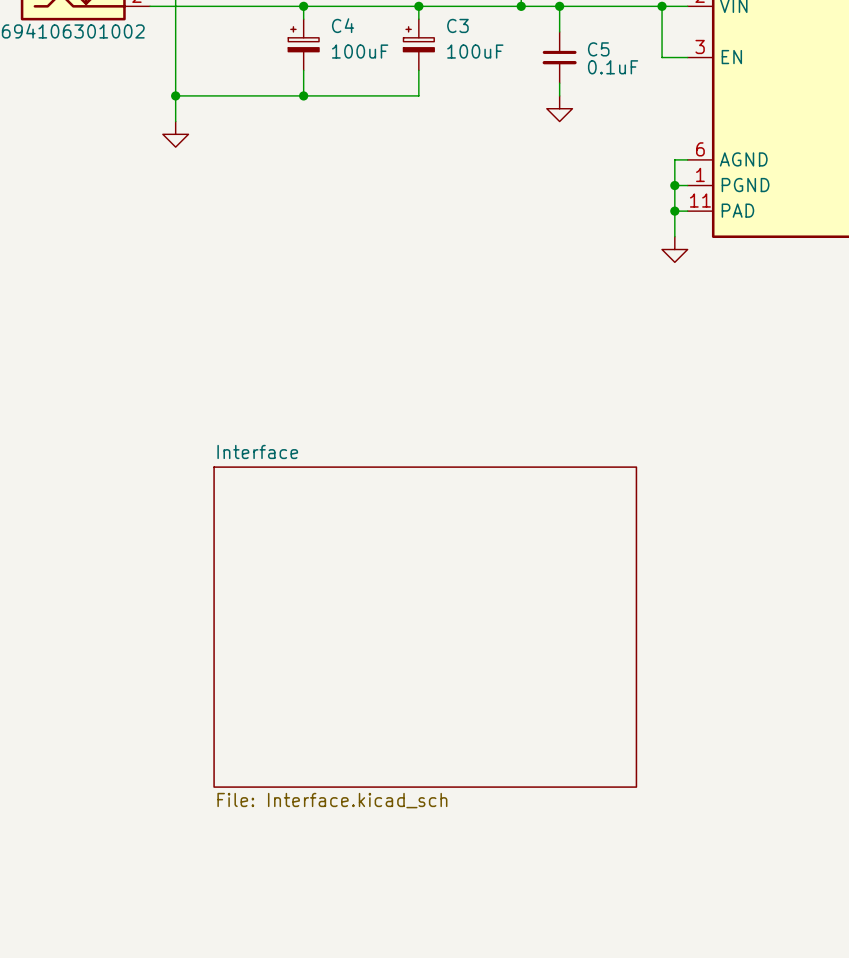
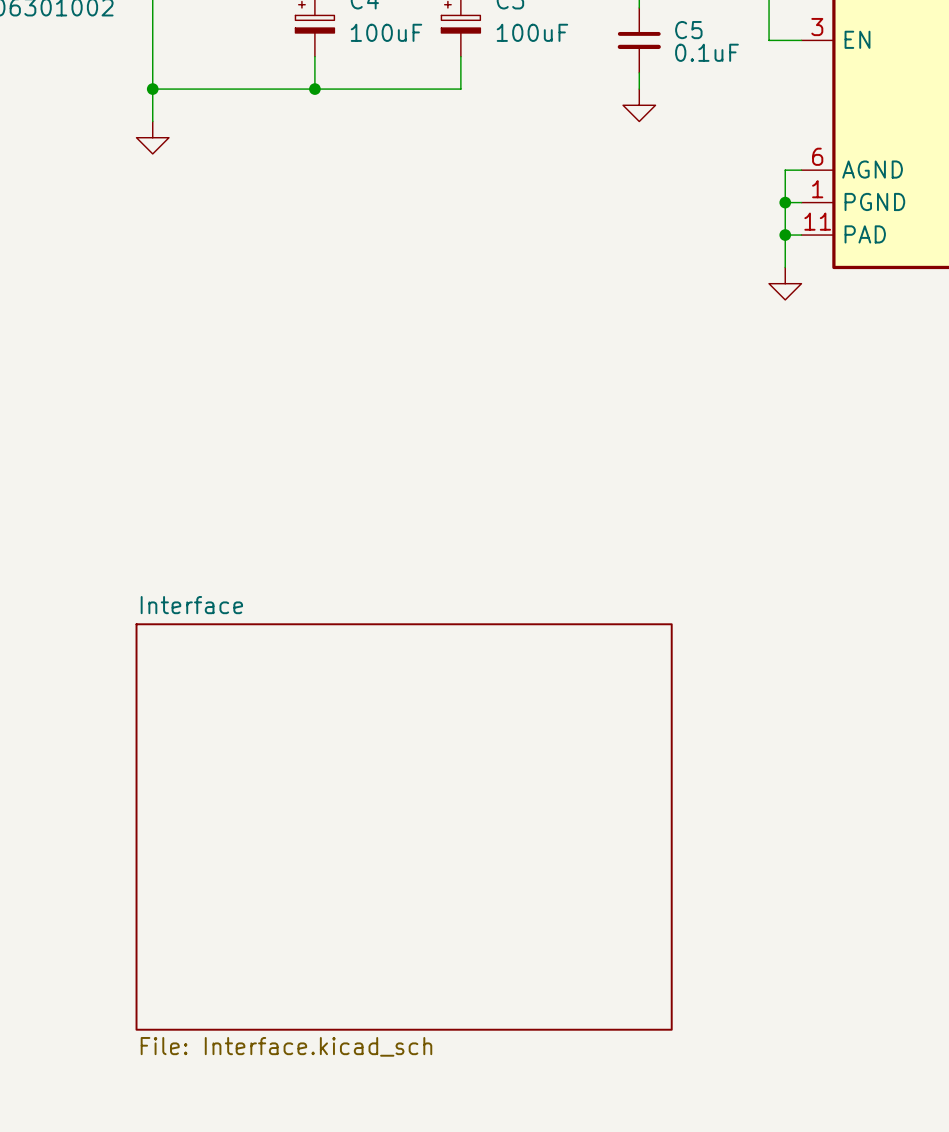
sheet Interface position: (425, 627) -> (404, 827)

